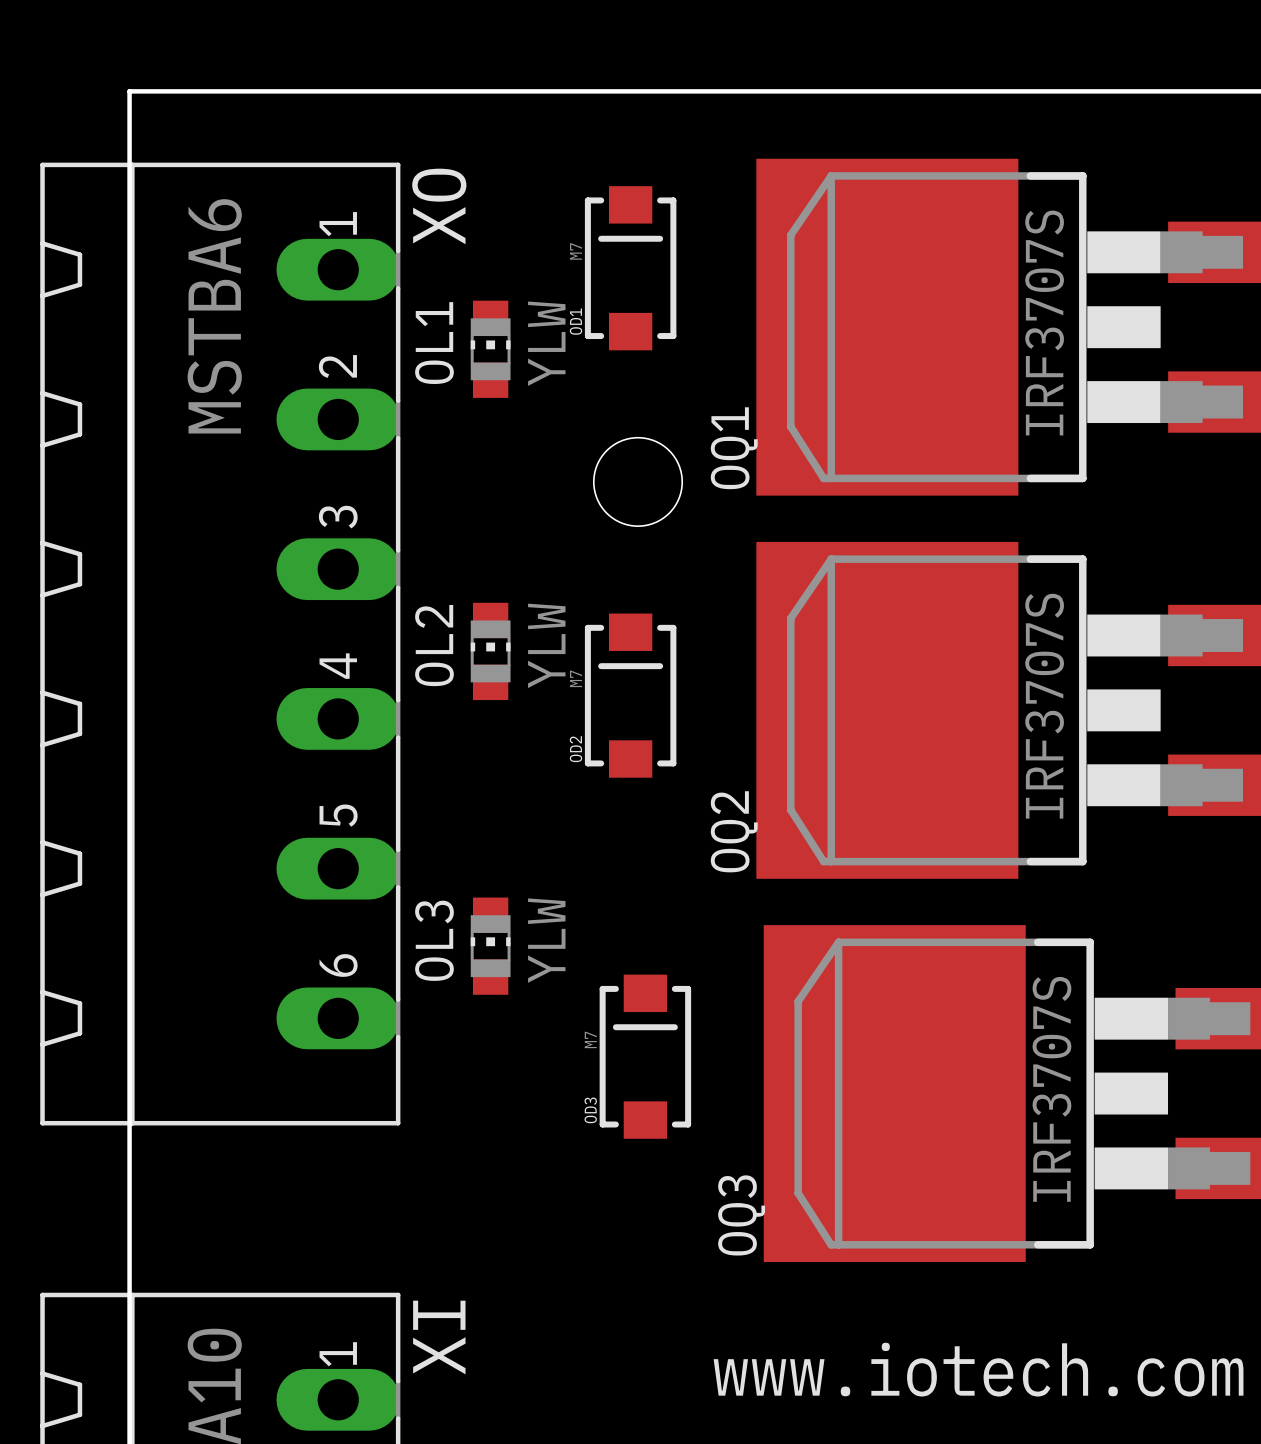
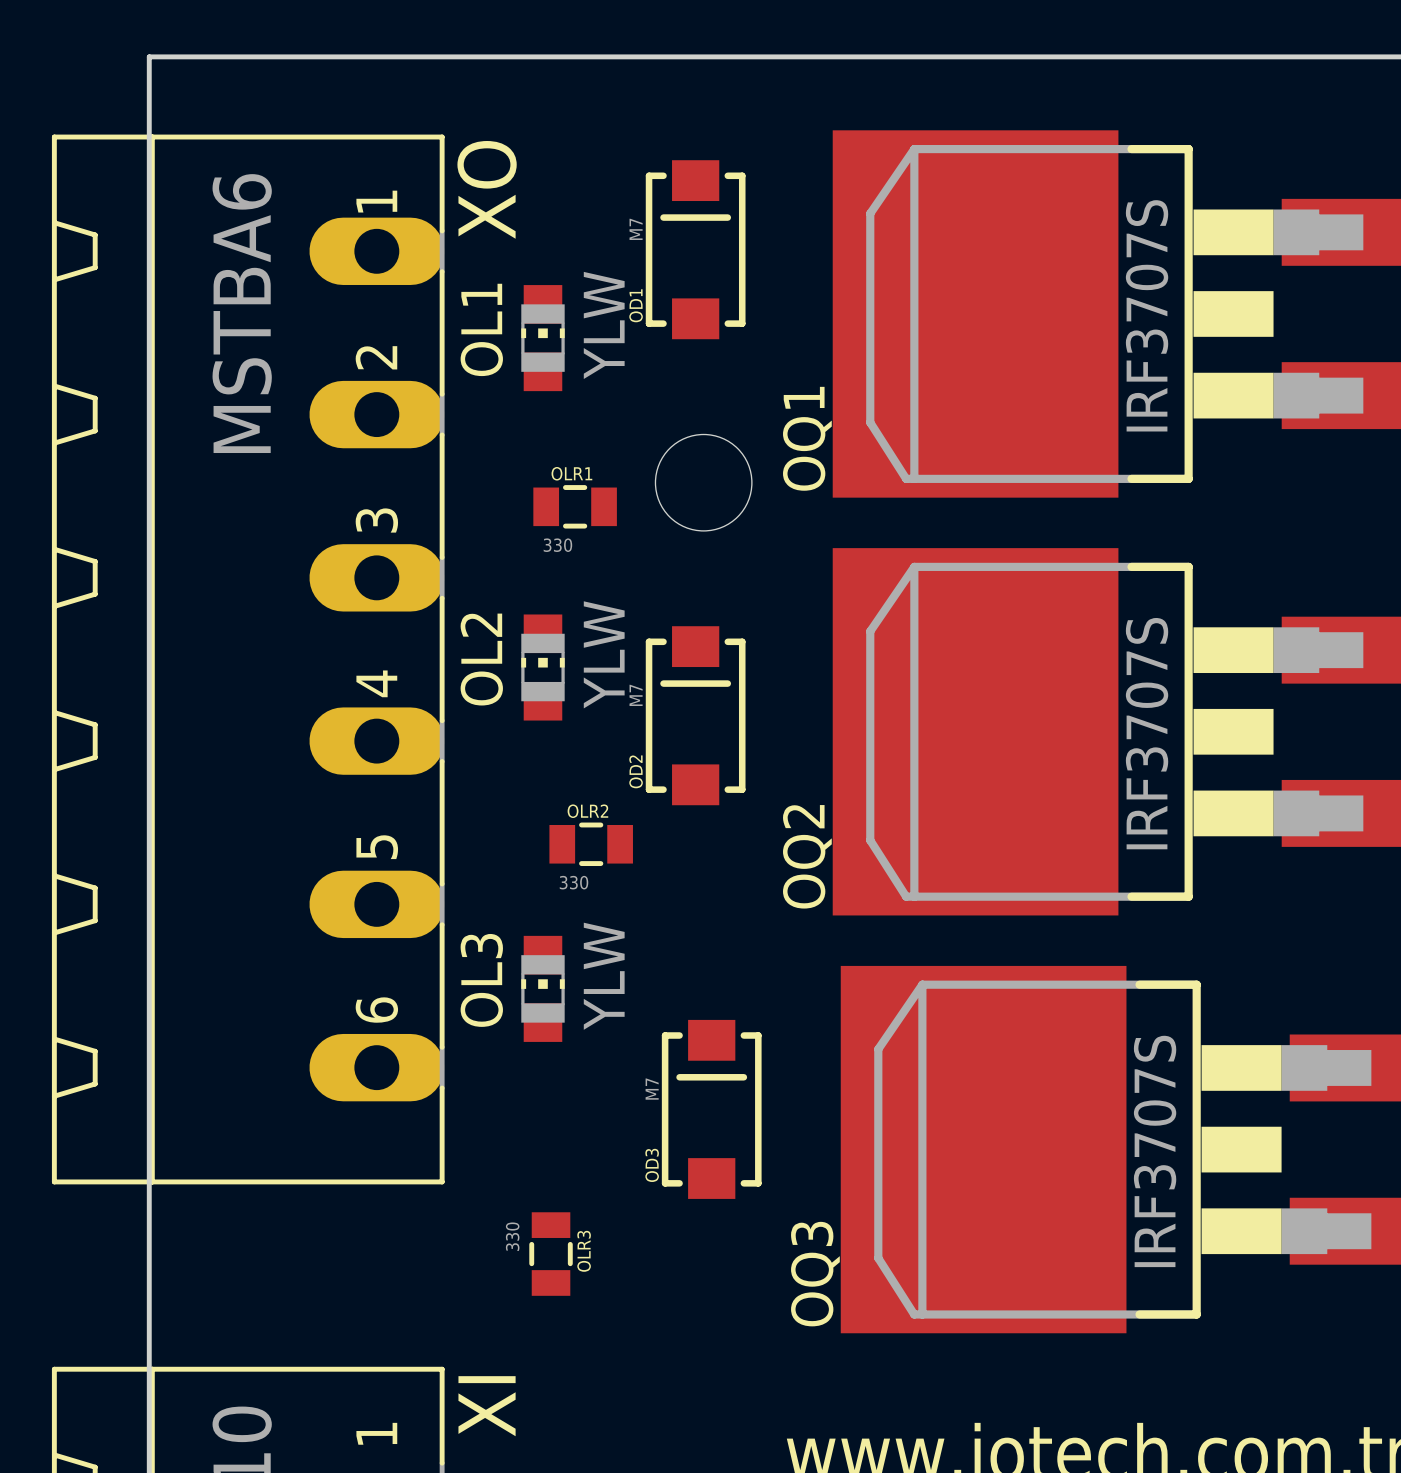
OLR1: none -> 330 (575, 506)
OLR2: none -> 330 (591, 844)
OLR3: none -> 330 (551, 1254)

